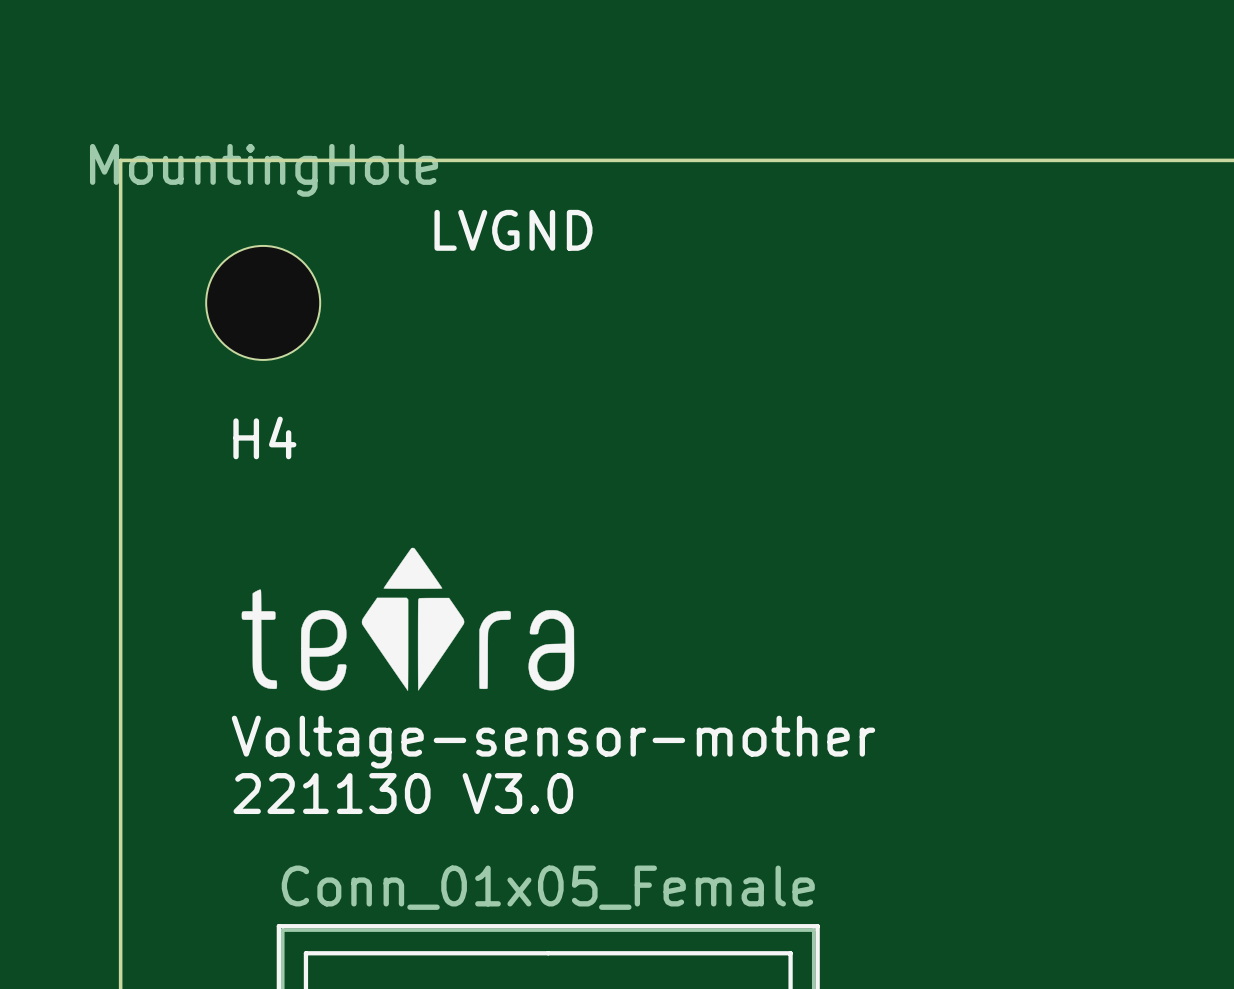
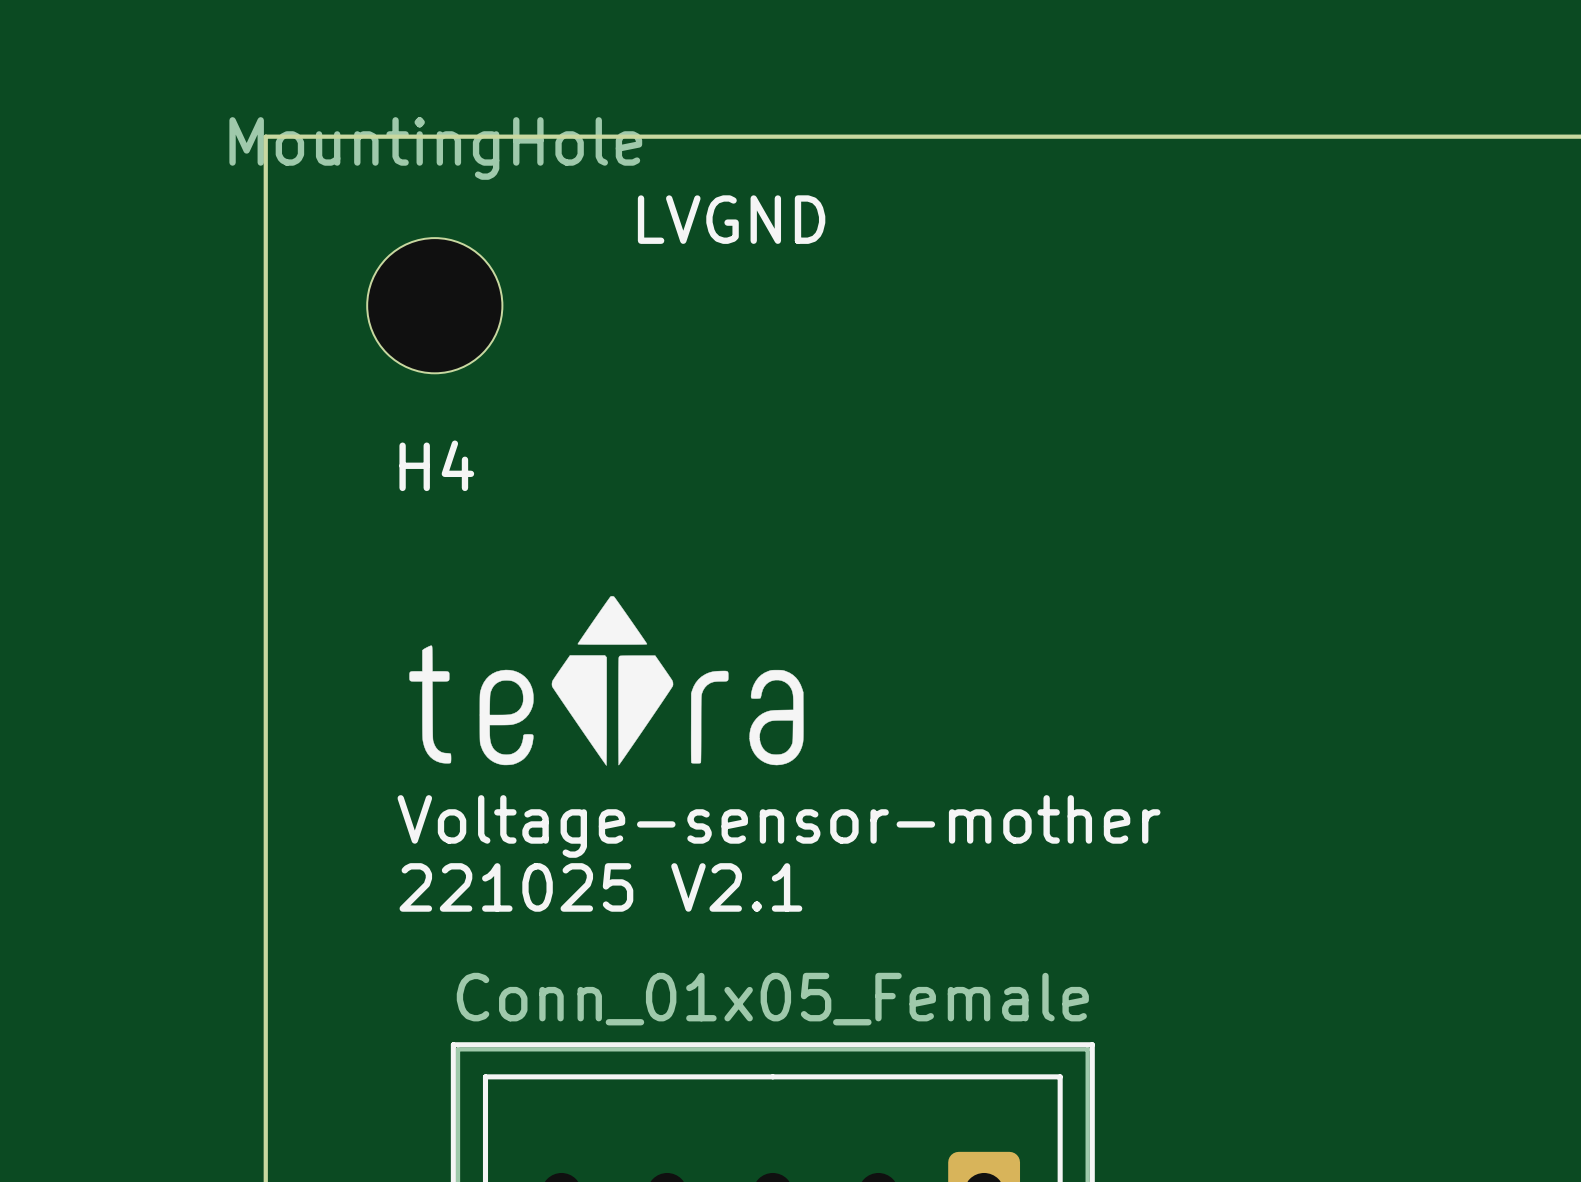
text: 221130 V3.0 (403, 793) -> 221025 V2.1 (600, 887)

